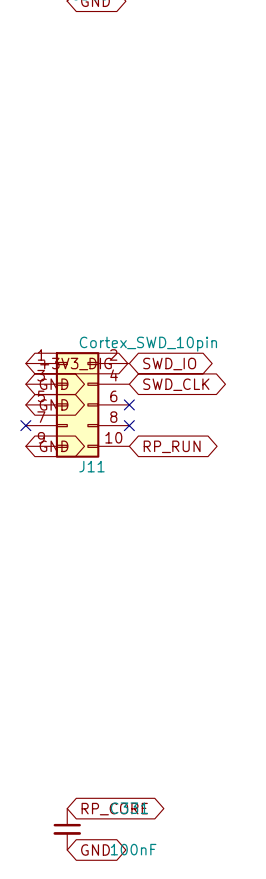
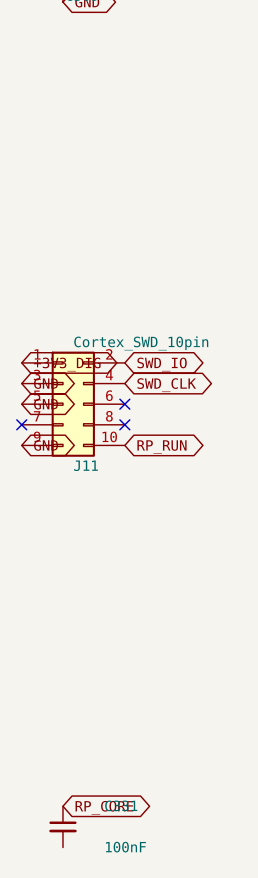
global label: GND (95, 850) -> none

